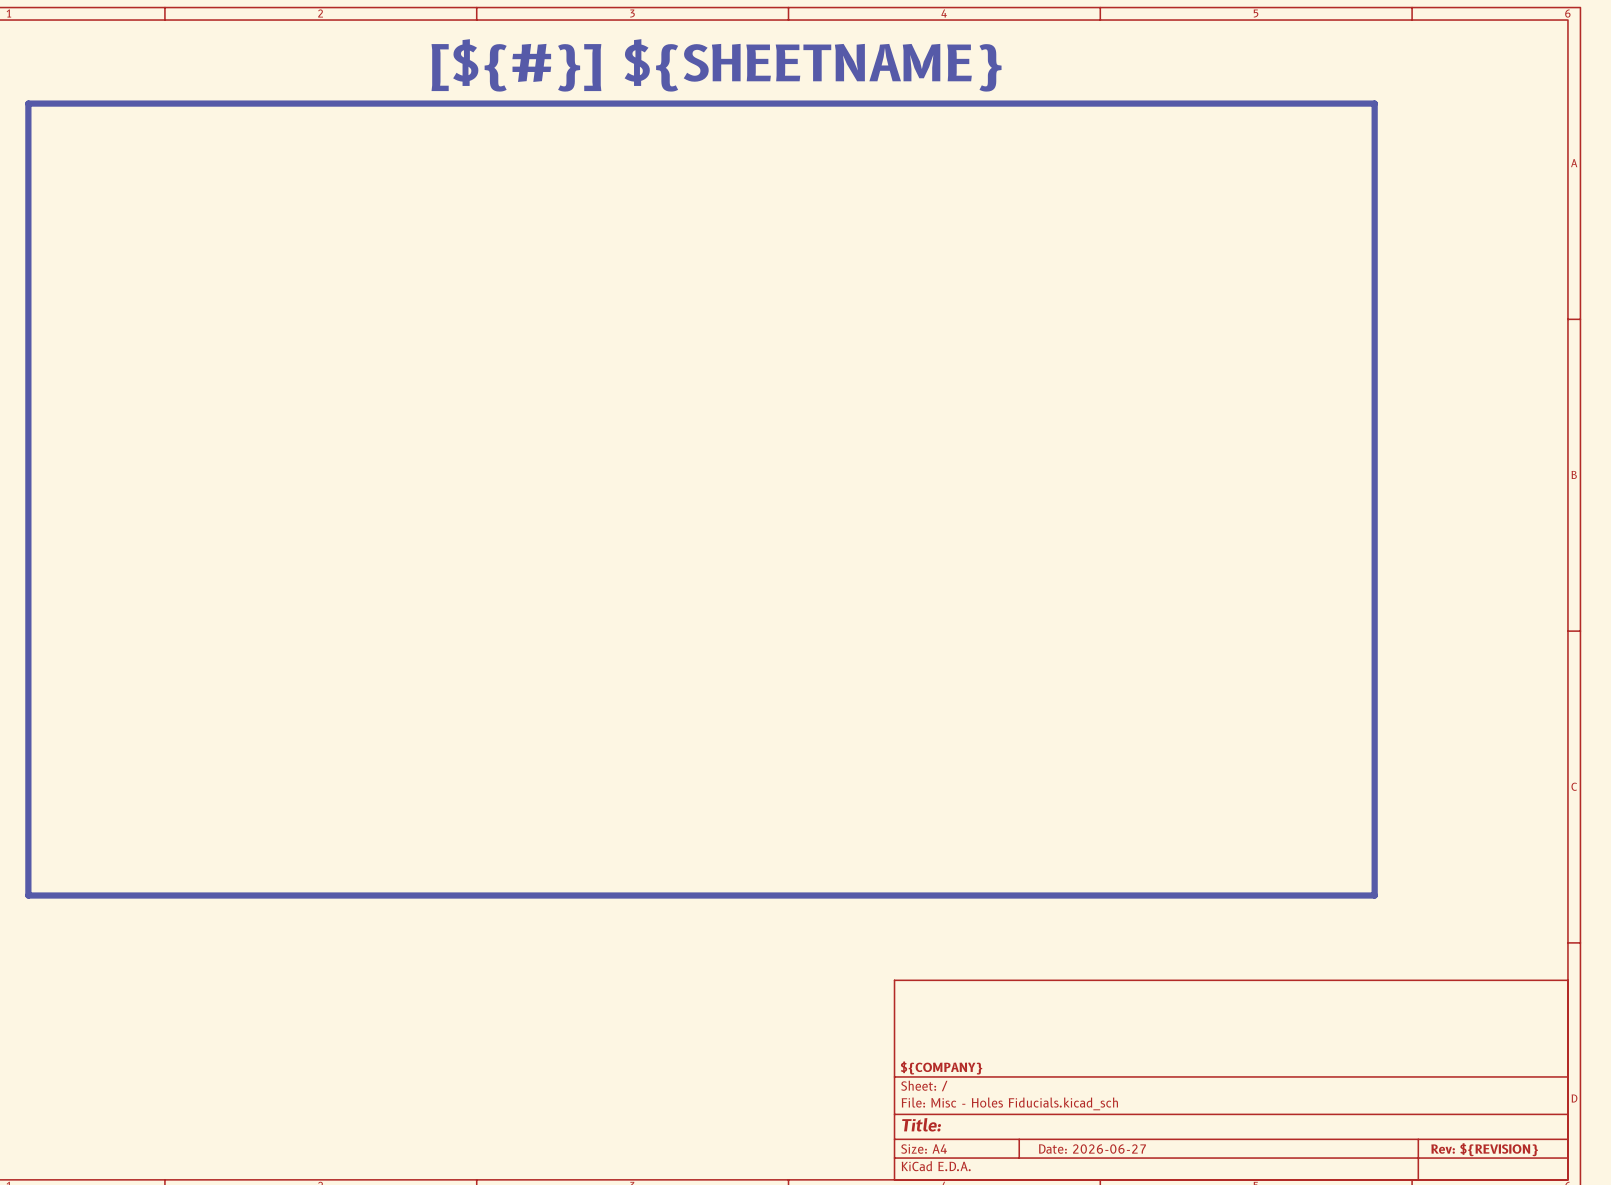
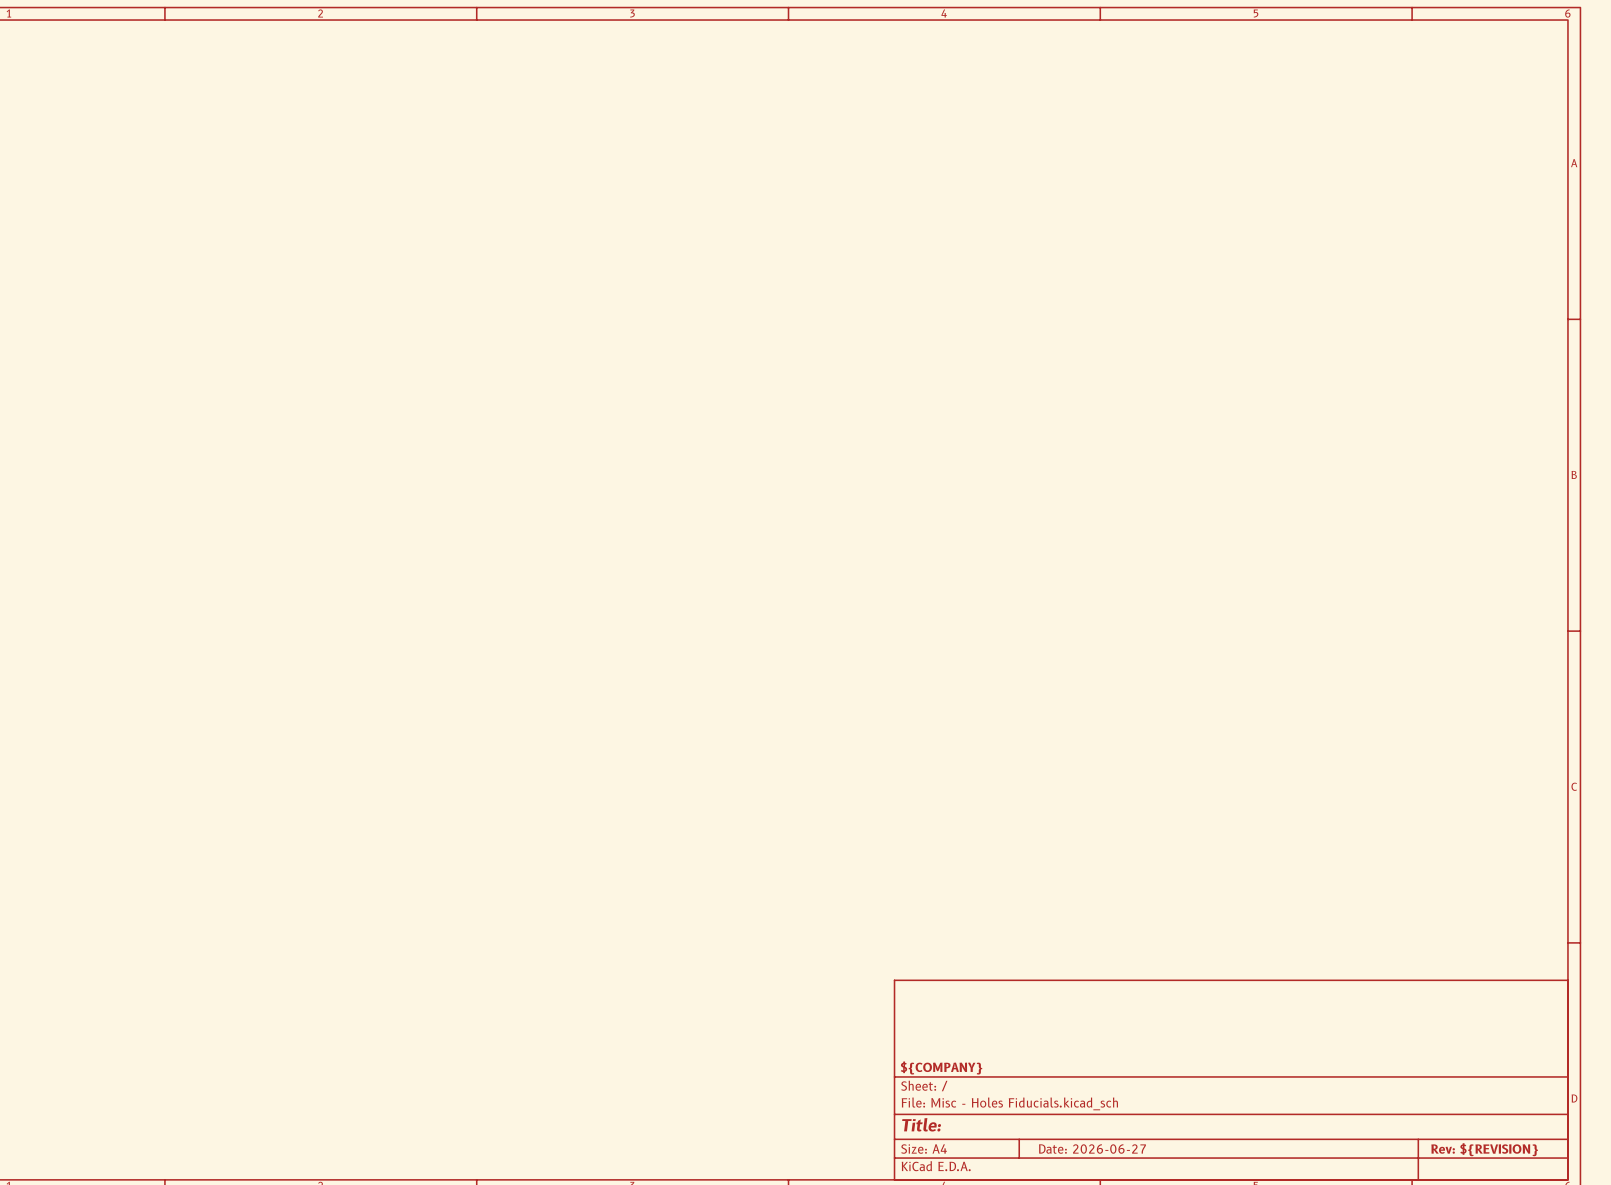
text: [${#}] ${SHEETNAME} (716, 65) -> none
line: (28, 103) (1374, 103) (1374, 895) (28, 895) (28, 103) -> none

